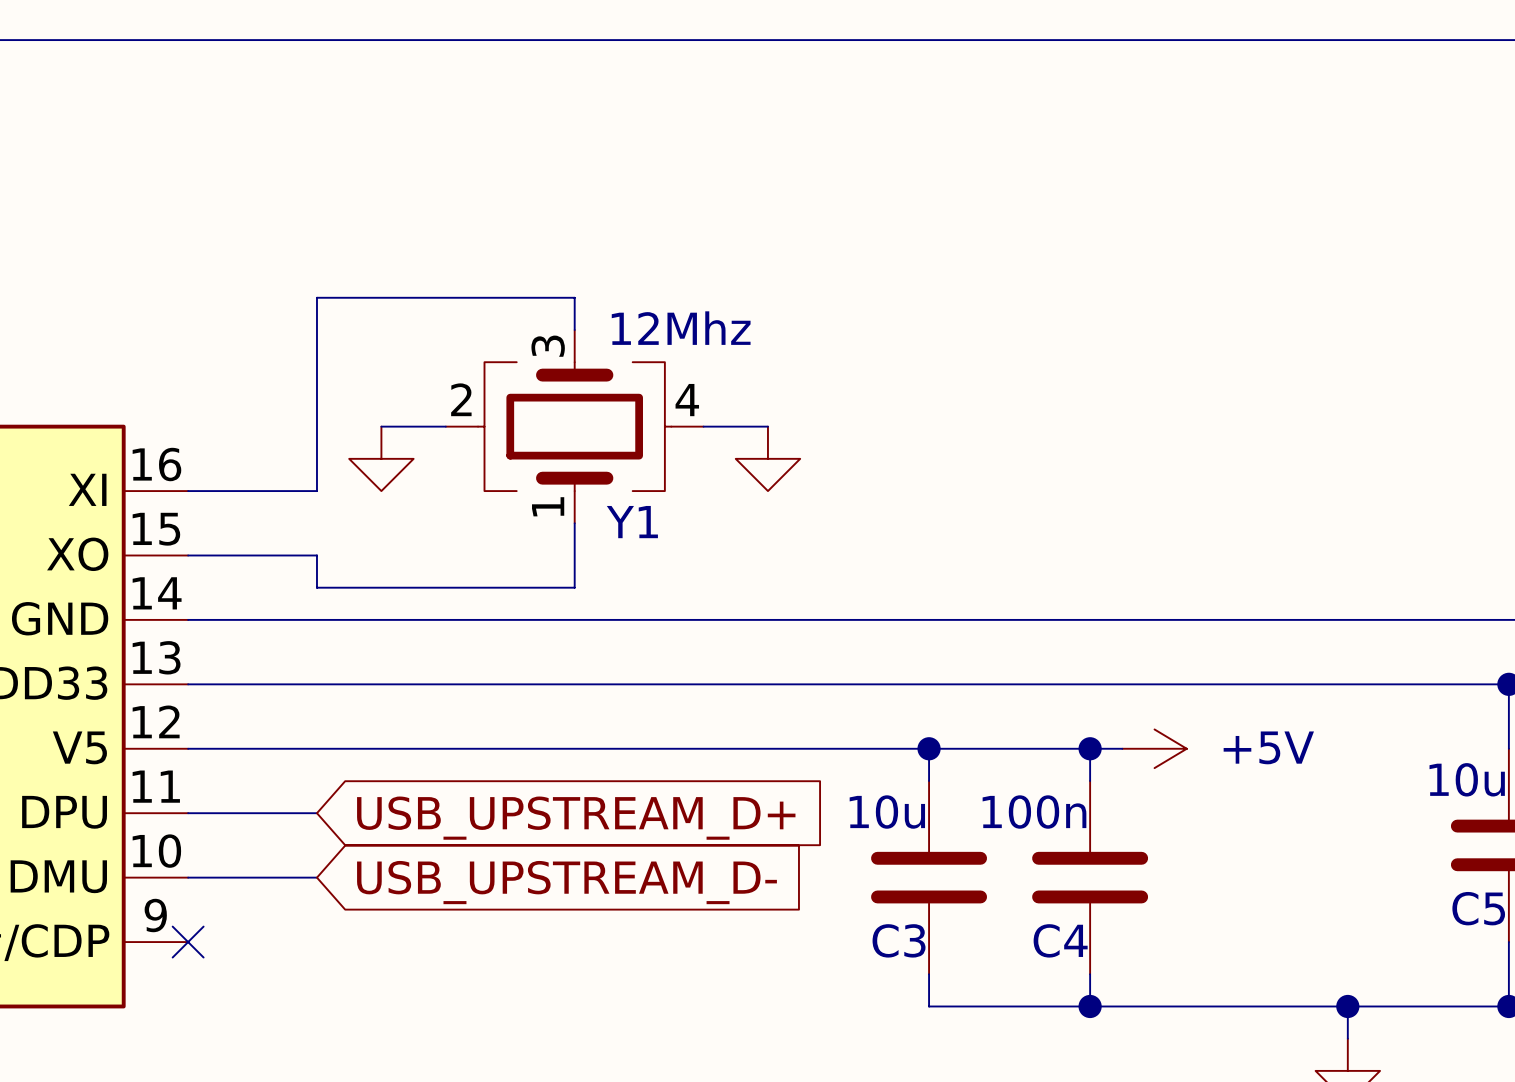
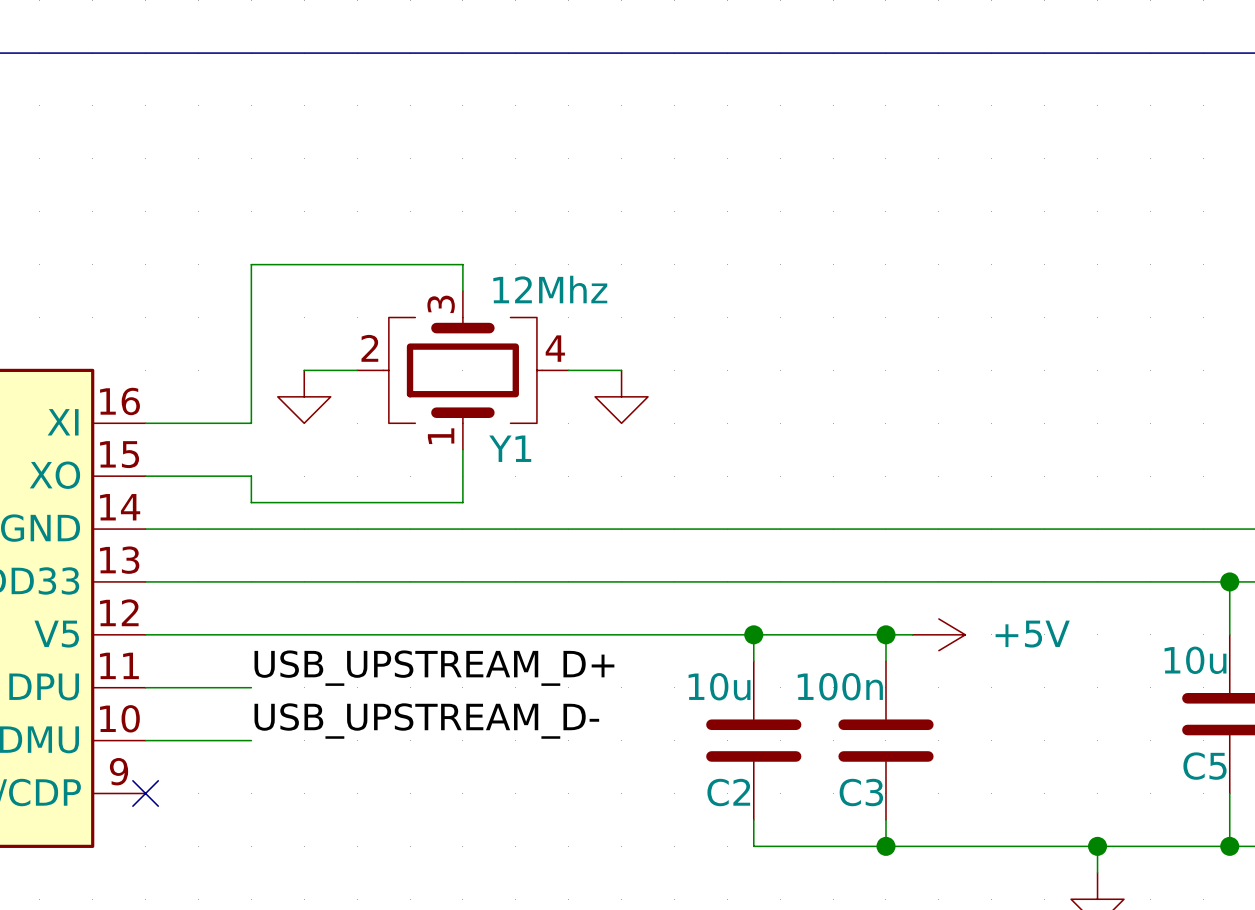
label: none -> USB_UPSTREAM_D+ (434, 668)
global label: USB_UPSTREAM_D+ (576, 818) -> none
label: none -> USB_UPSTREAM_D- (426, 721)
global label: USB_UPSTREAM_D- (566, 882) -> none
C3 name: C3 (899, 940) -> C2 (728, 792)
C4 name: C4 (1060, 940) -> C3 (861, 792)

